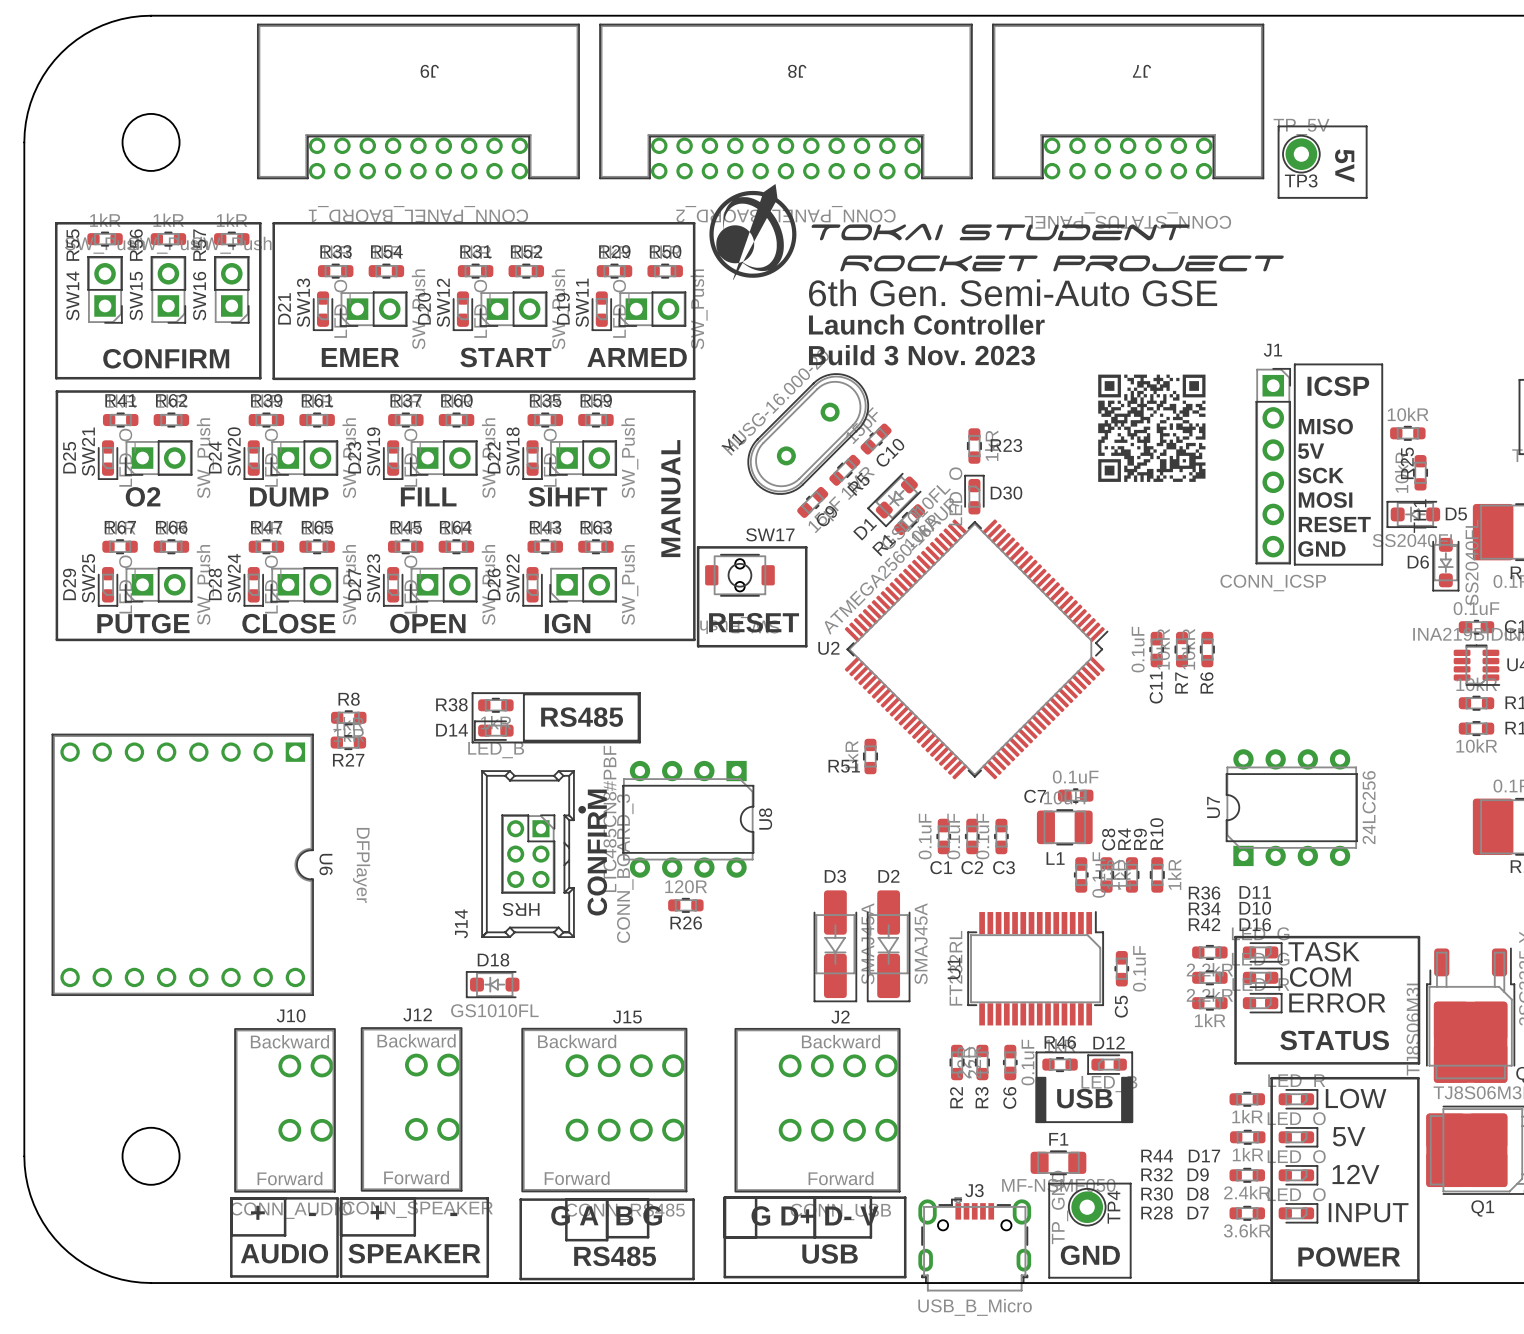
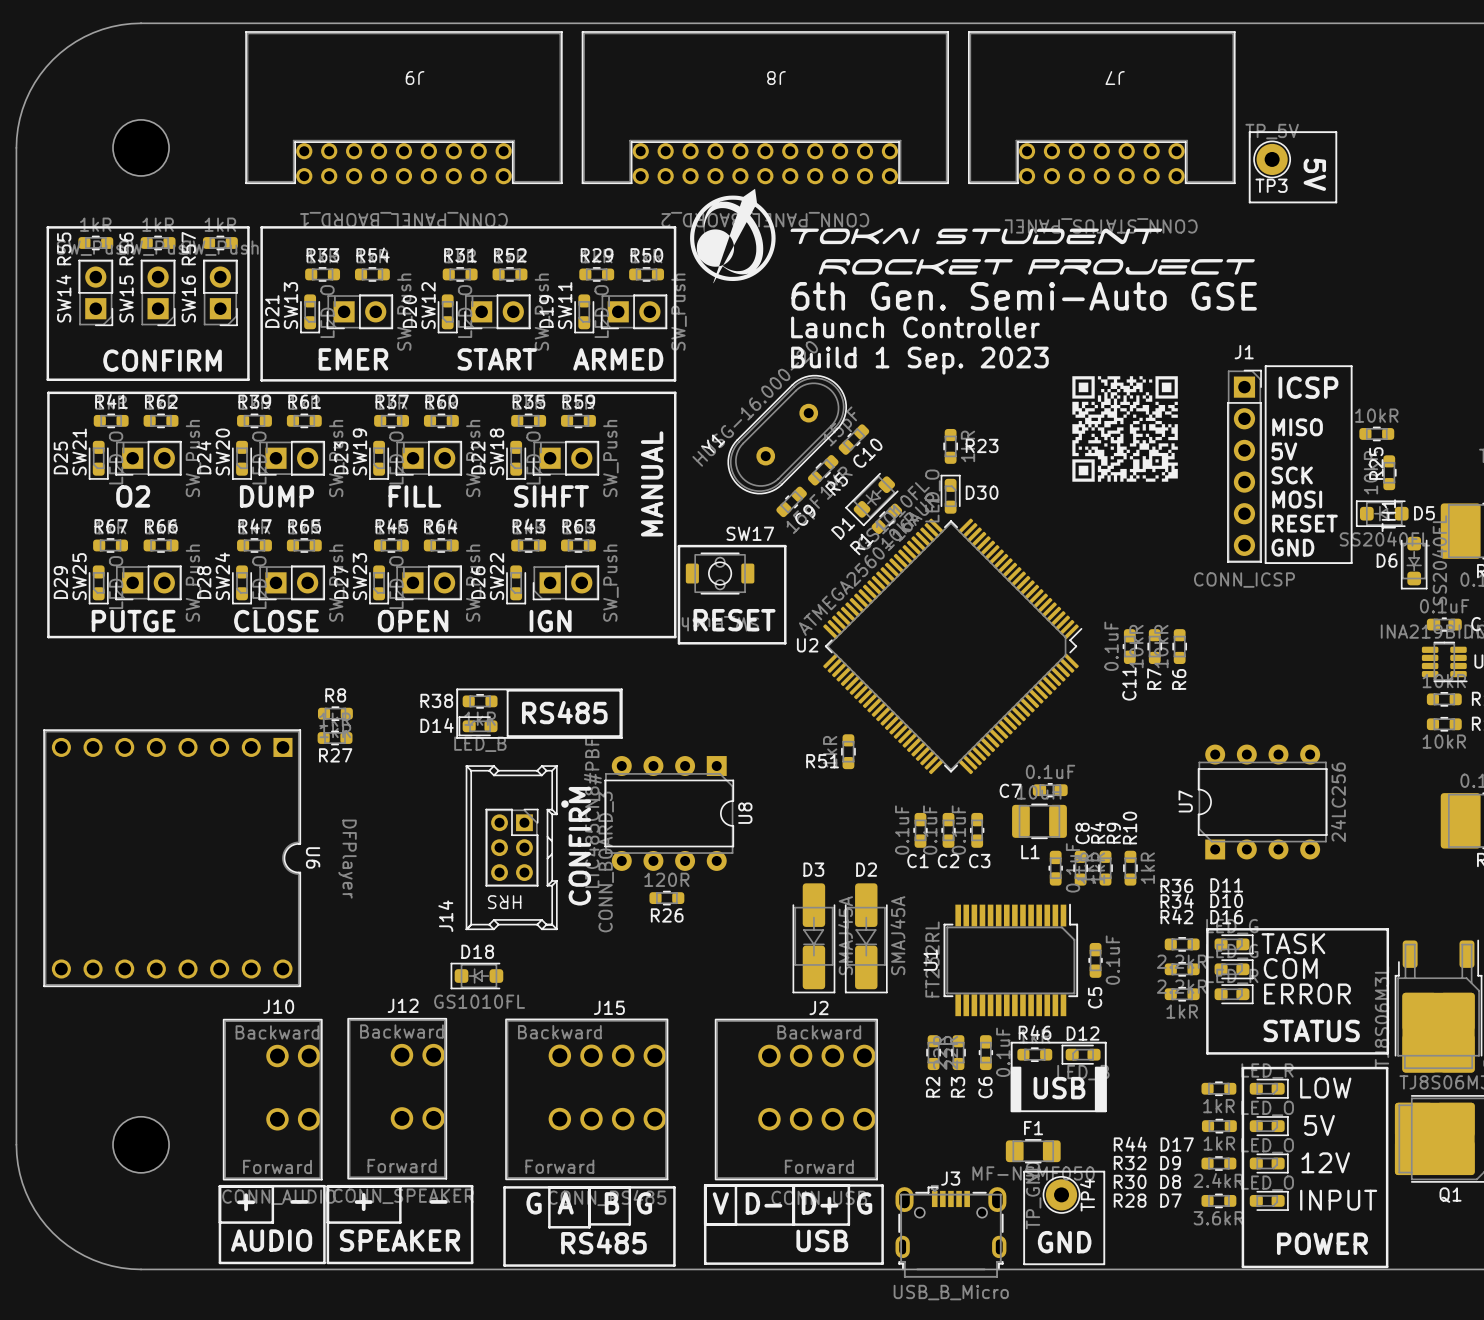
text: Build 3 Nov. 2023 (921, 355) -> Build 1 Sep. 2023 (919, 360)
text: G D+ D- V (814, 1215) -> V D- D+ G (792, 1203)

